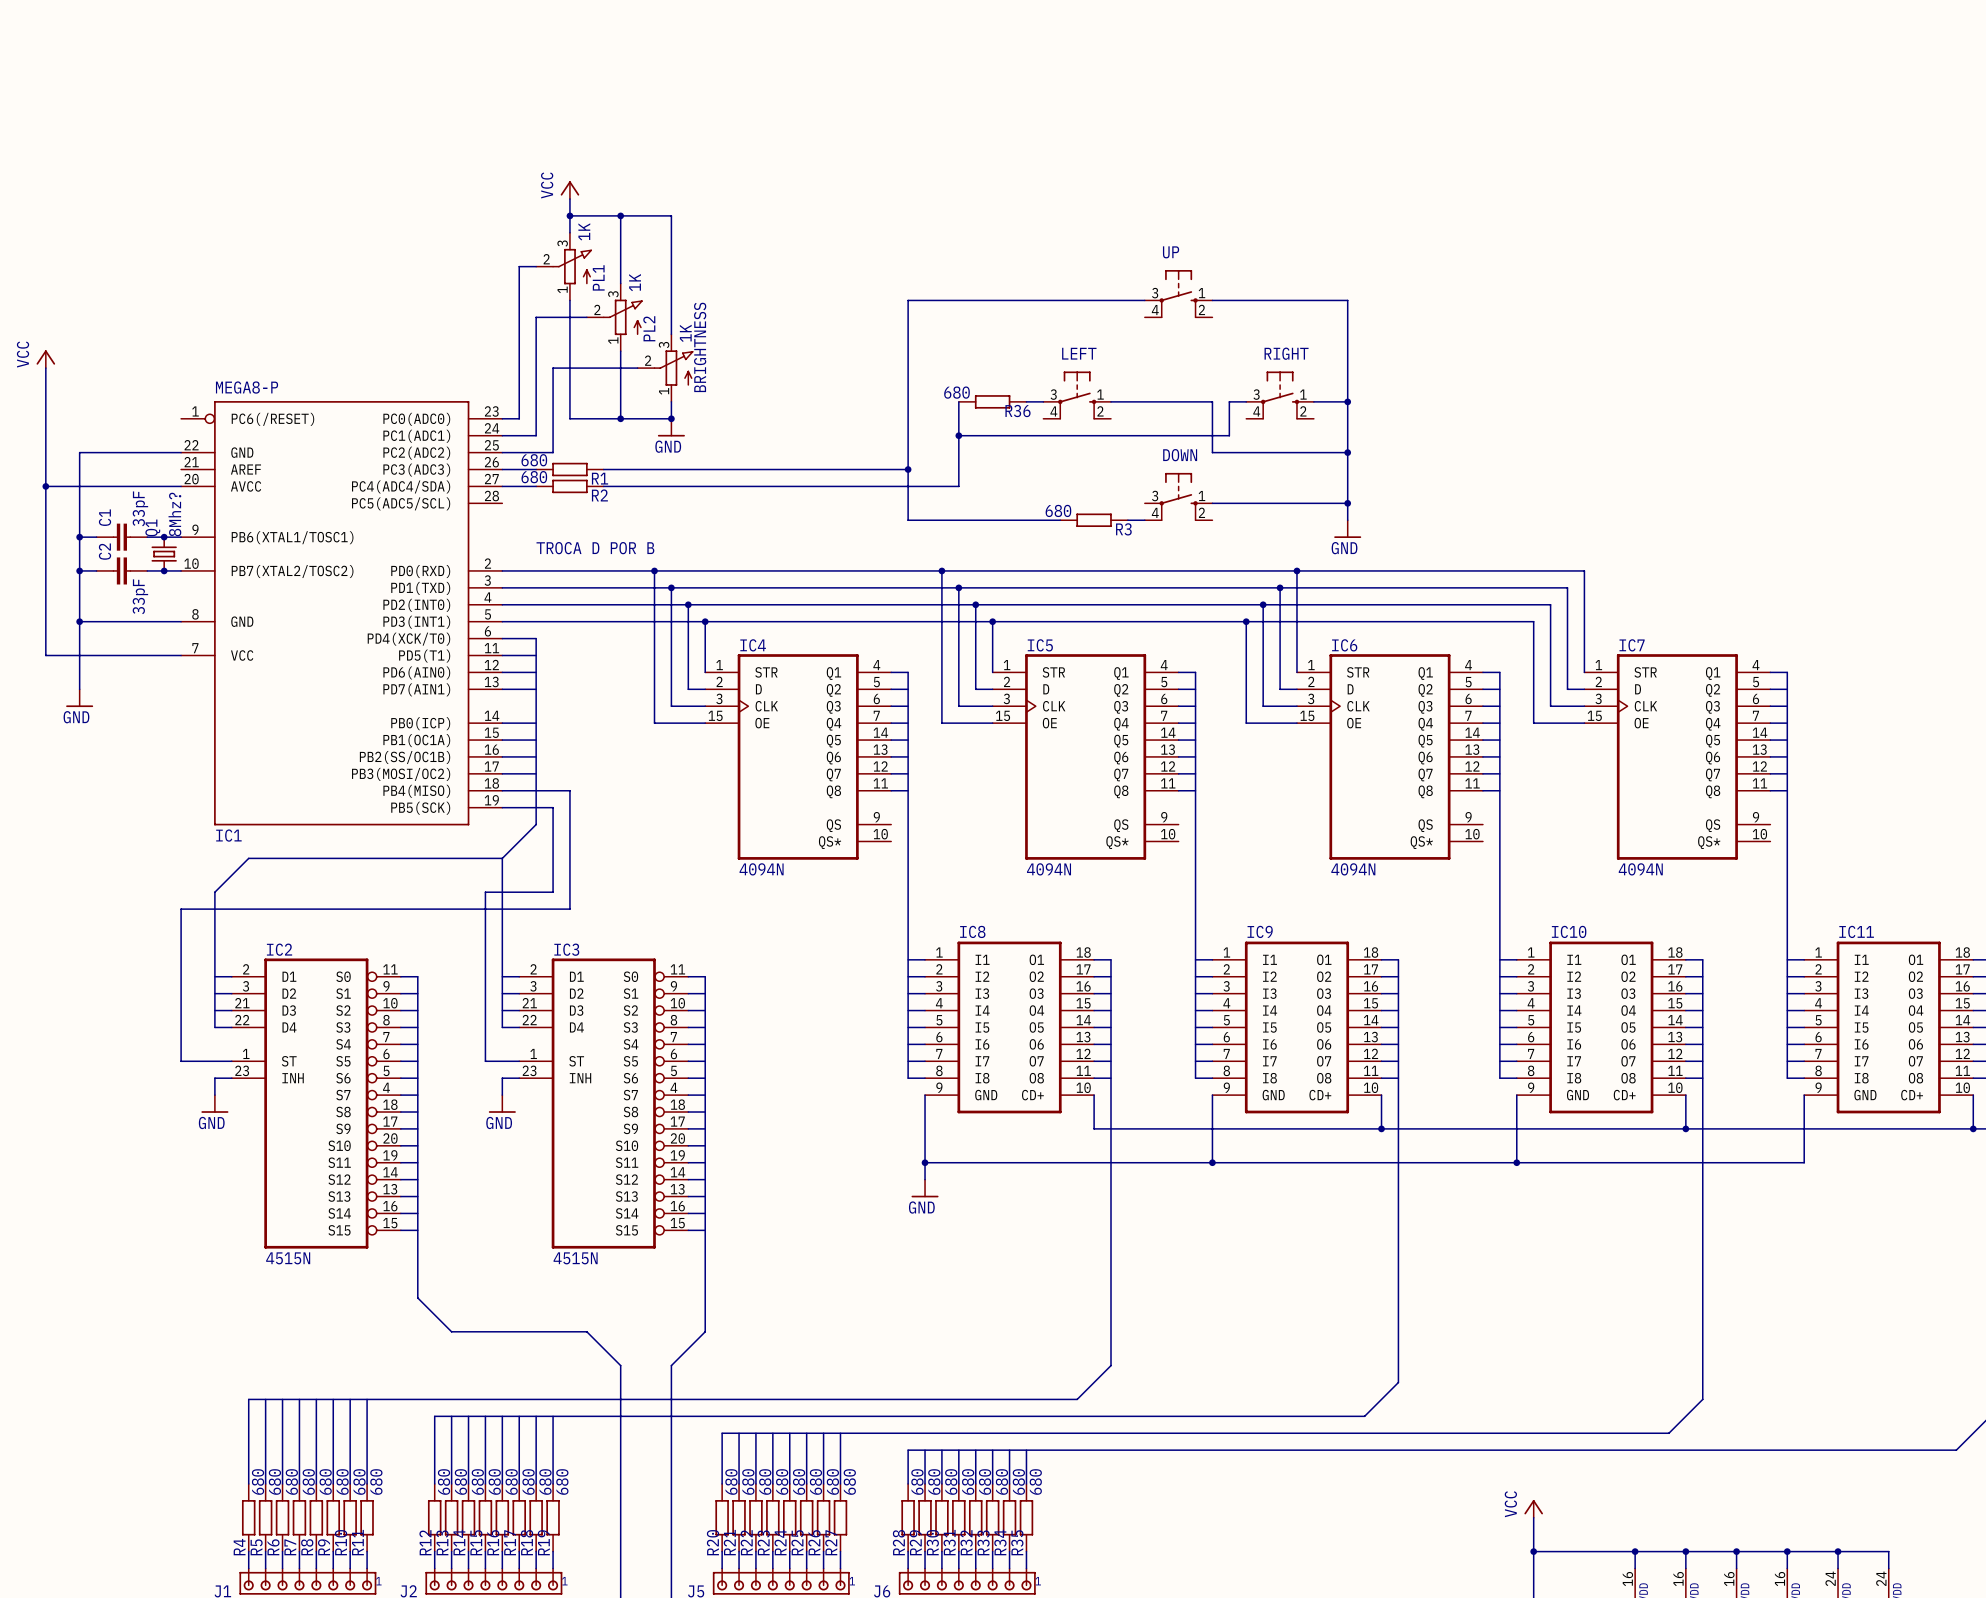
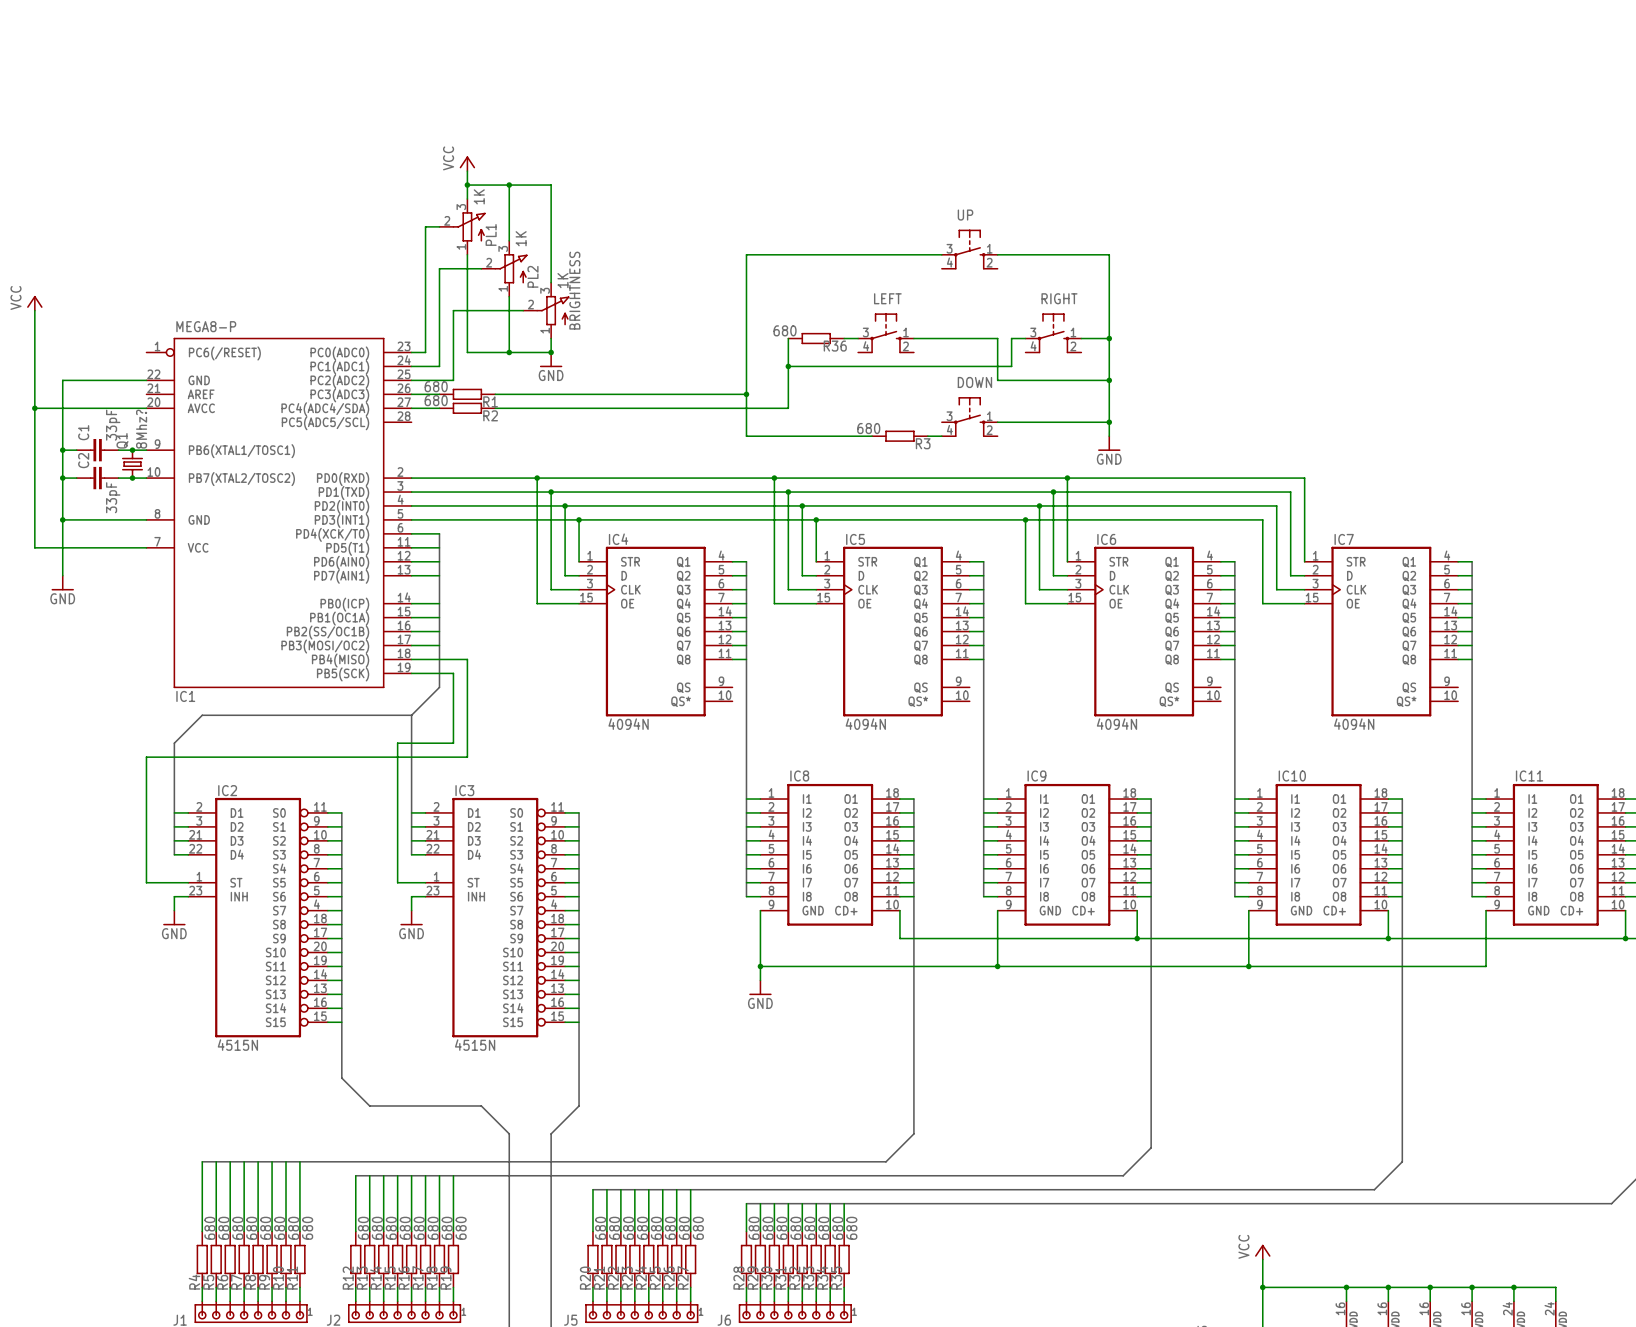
text: TROCA D POR B (595, 548) -> none

